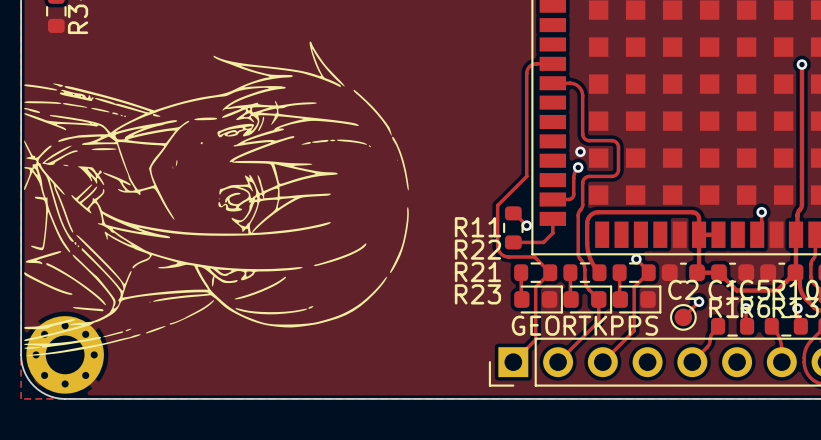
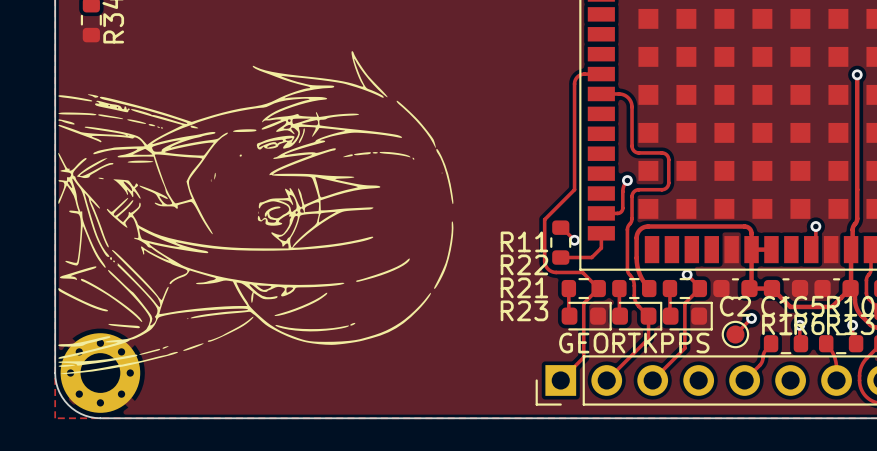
via: (580, 151) -> none

